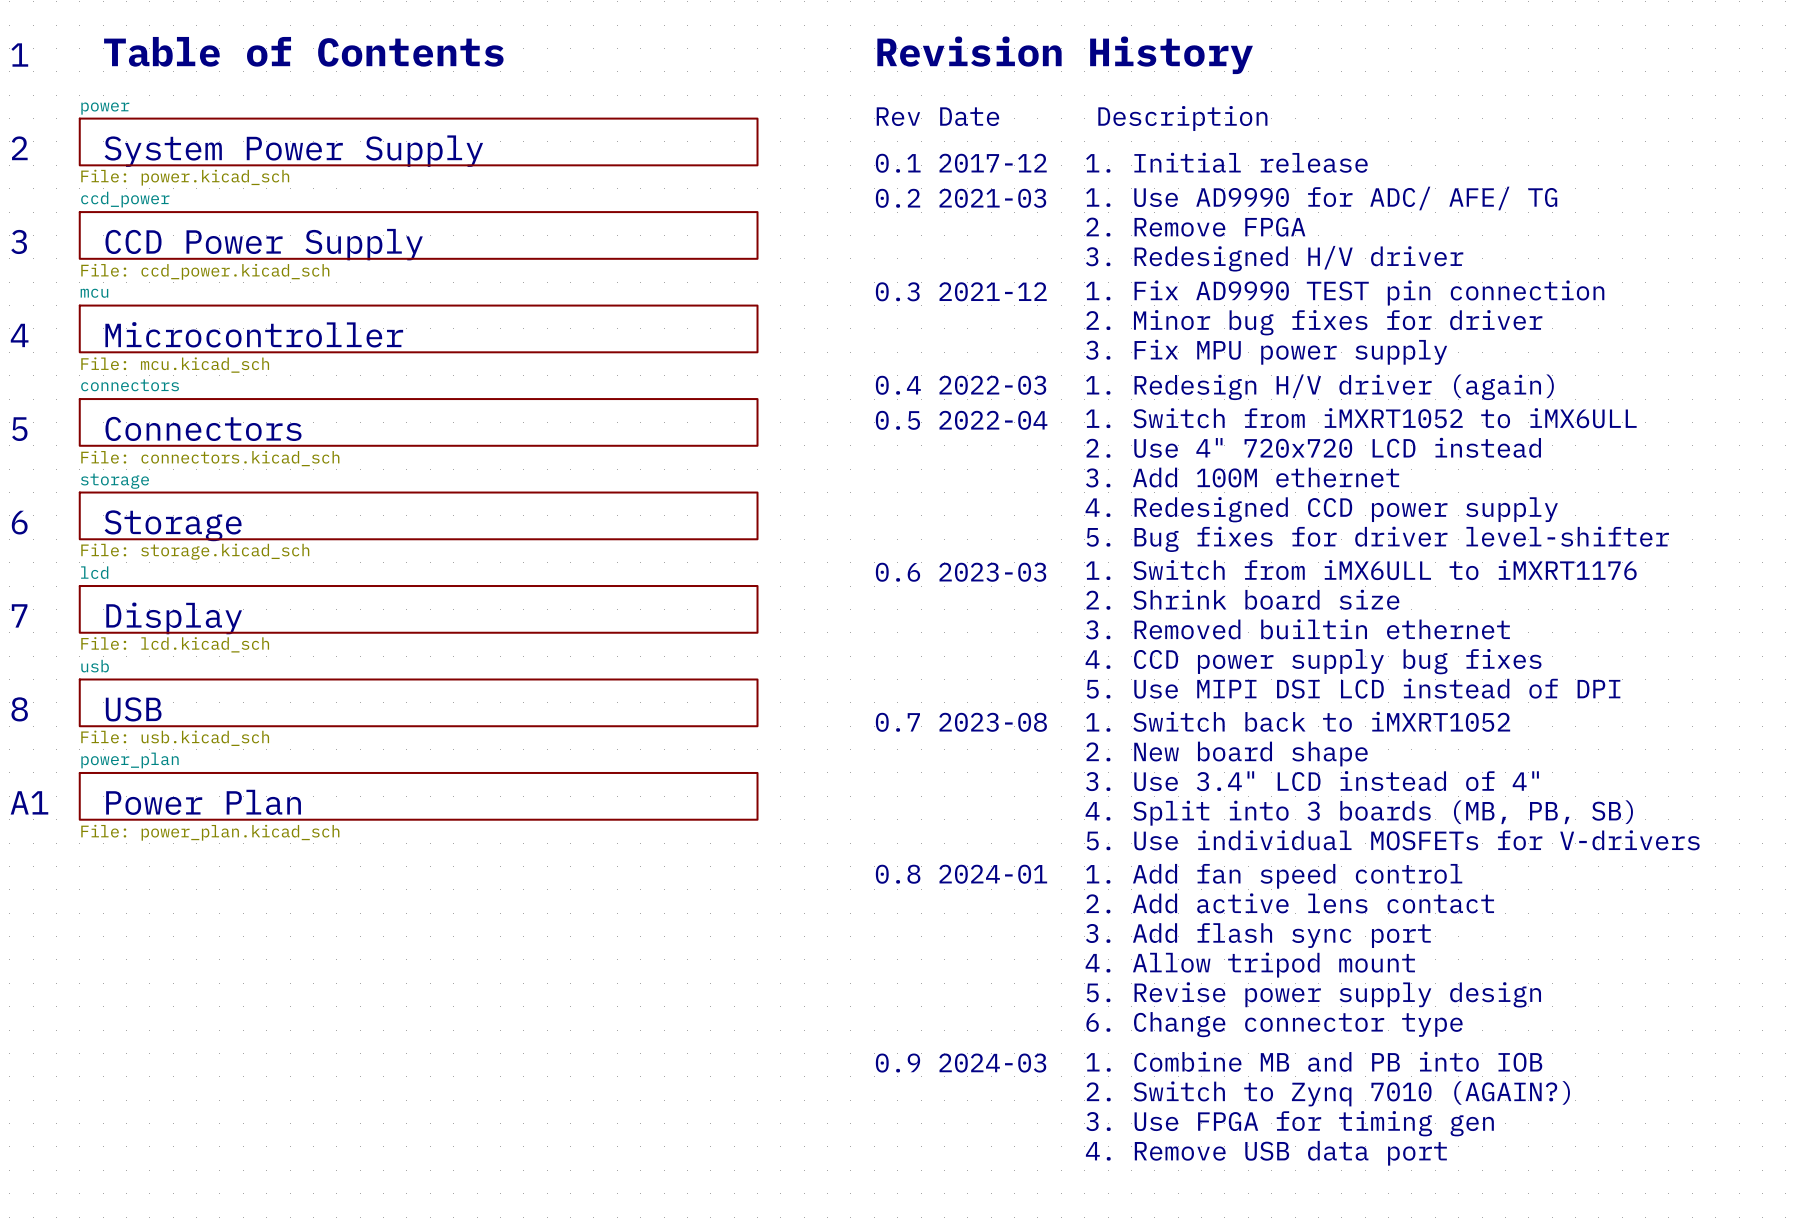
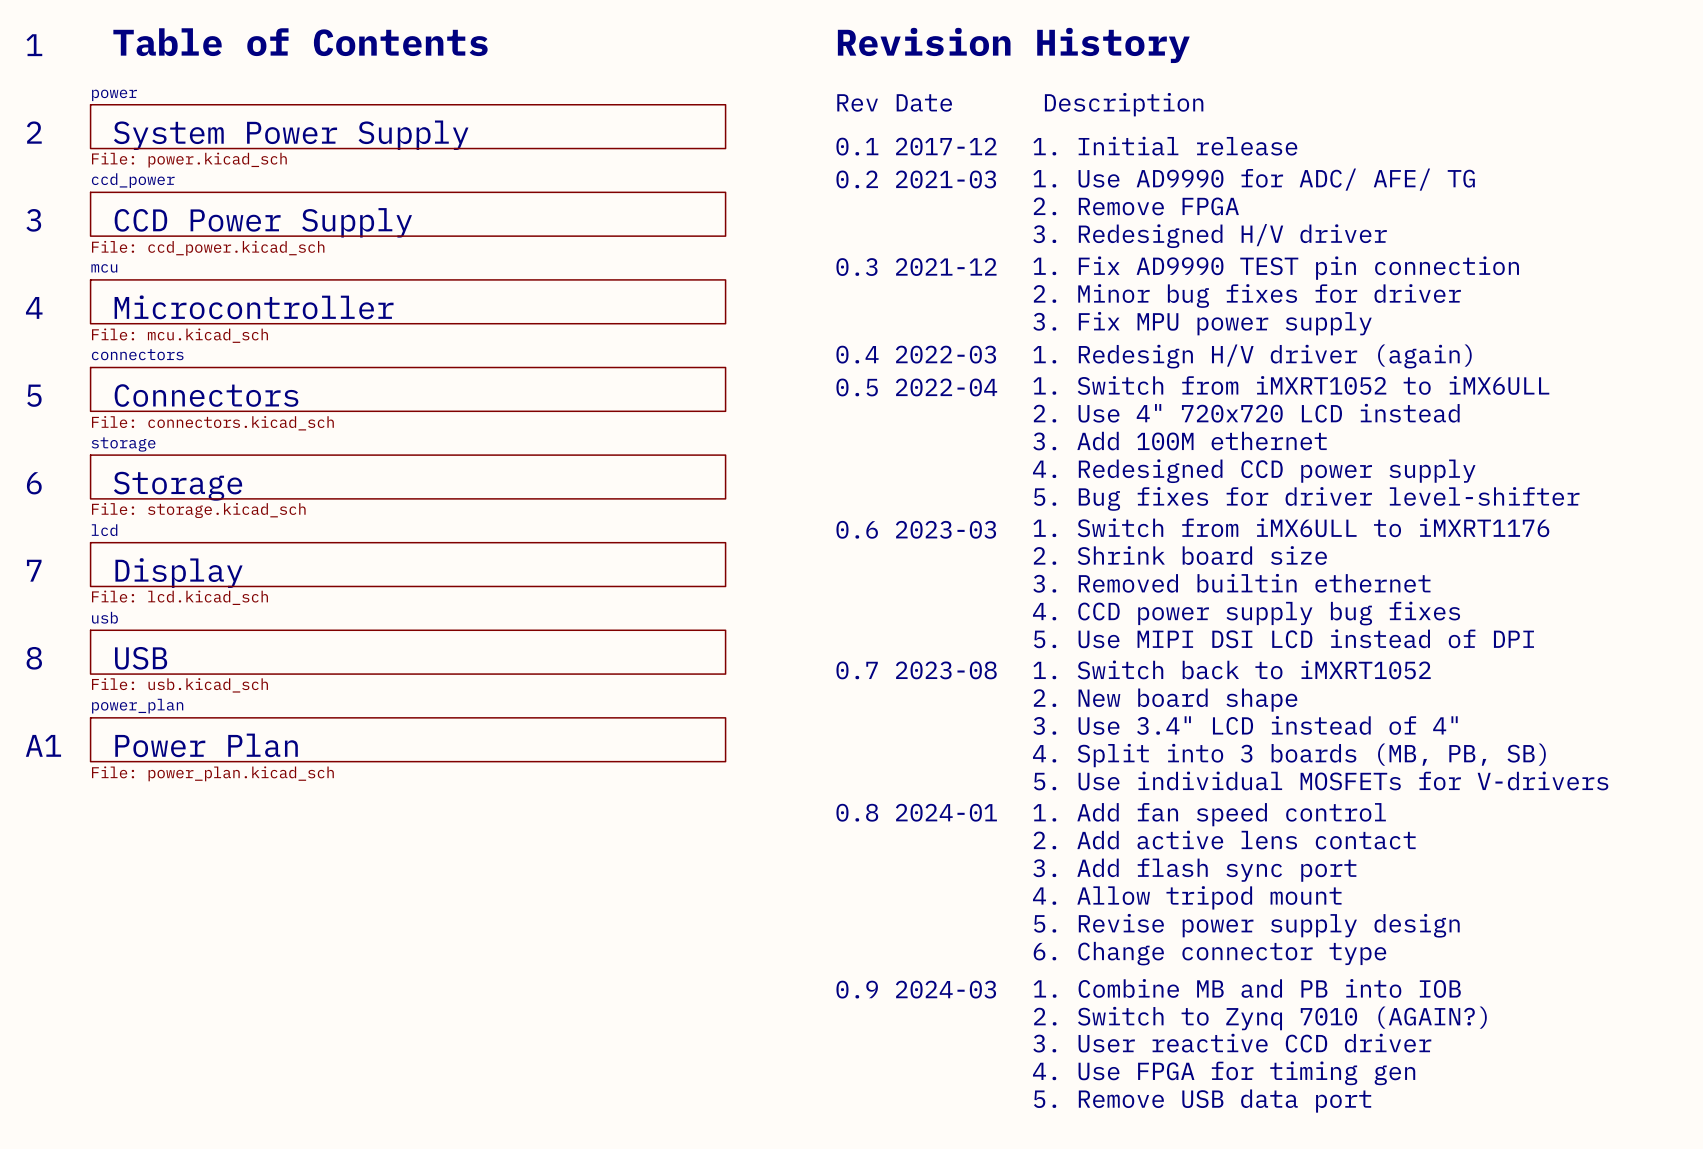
text: 3. Use FPGA for timing gen (1290, 1123) -> 3. User reactive CCD driver (1232, 1043)
text: 4. Remove USB data port (1266, 1153) -> 4. Use FPGA for timing gen (1224, 1073)
text: none -> 5. Remove USB data port (1202, 1101)

